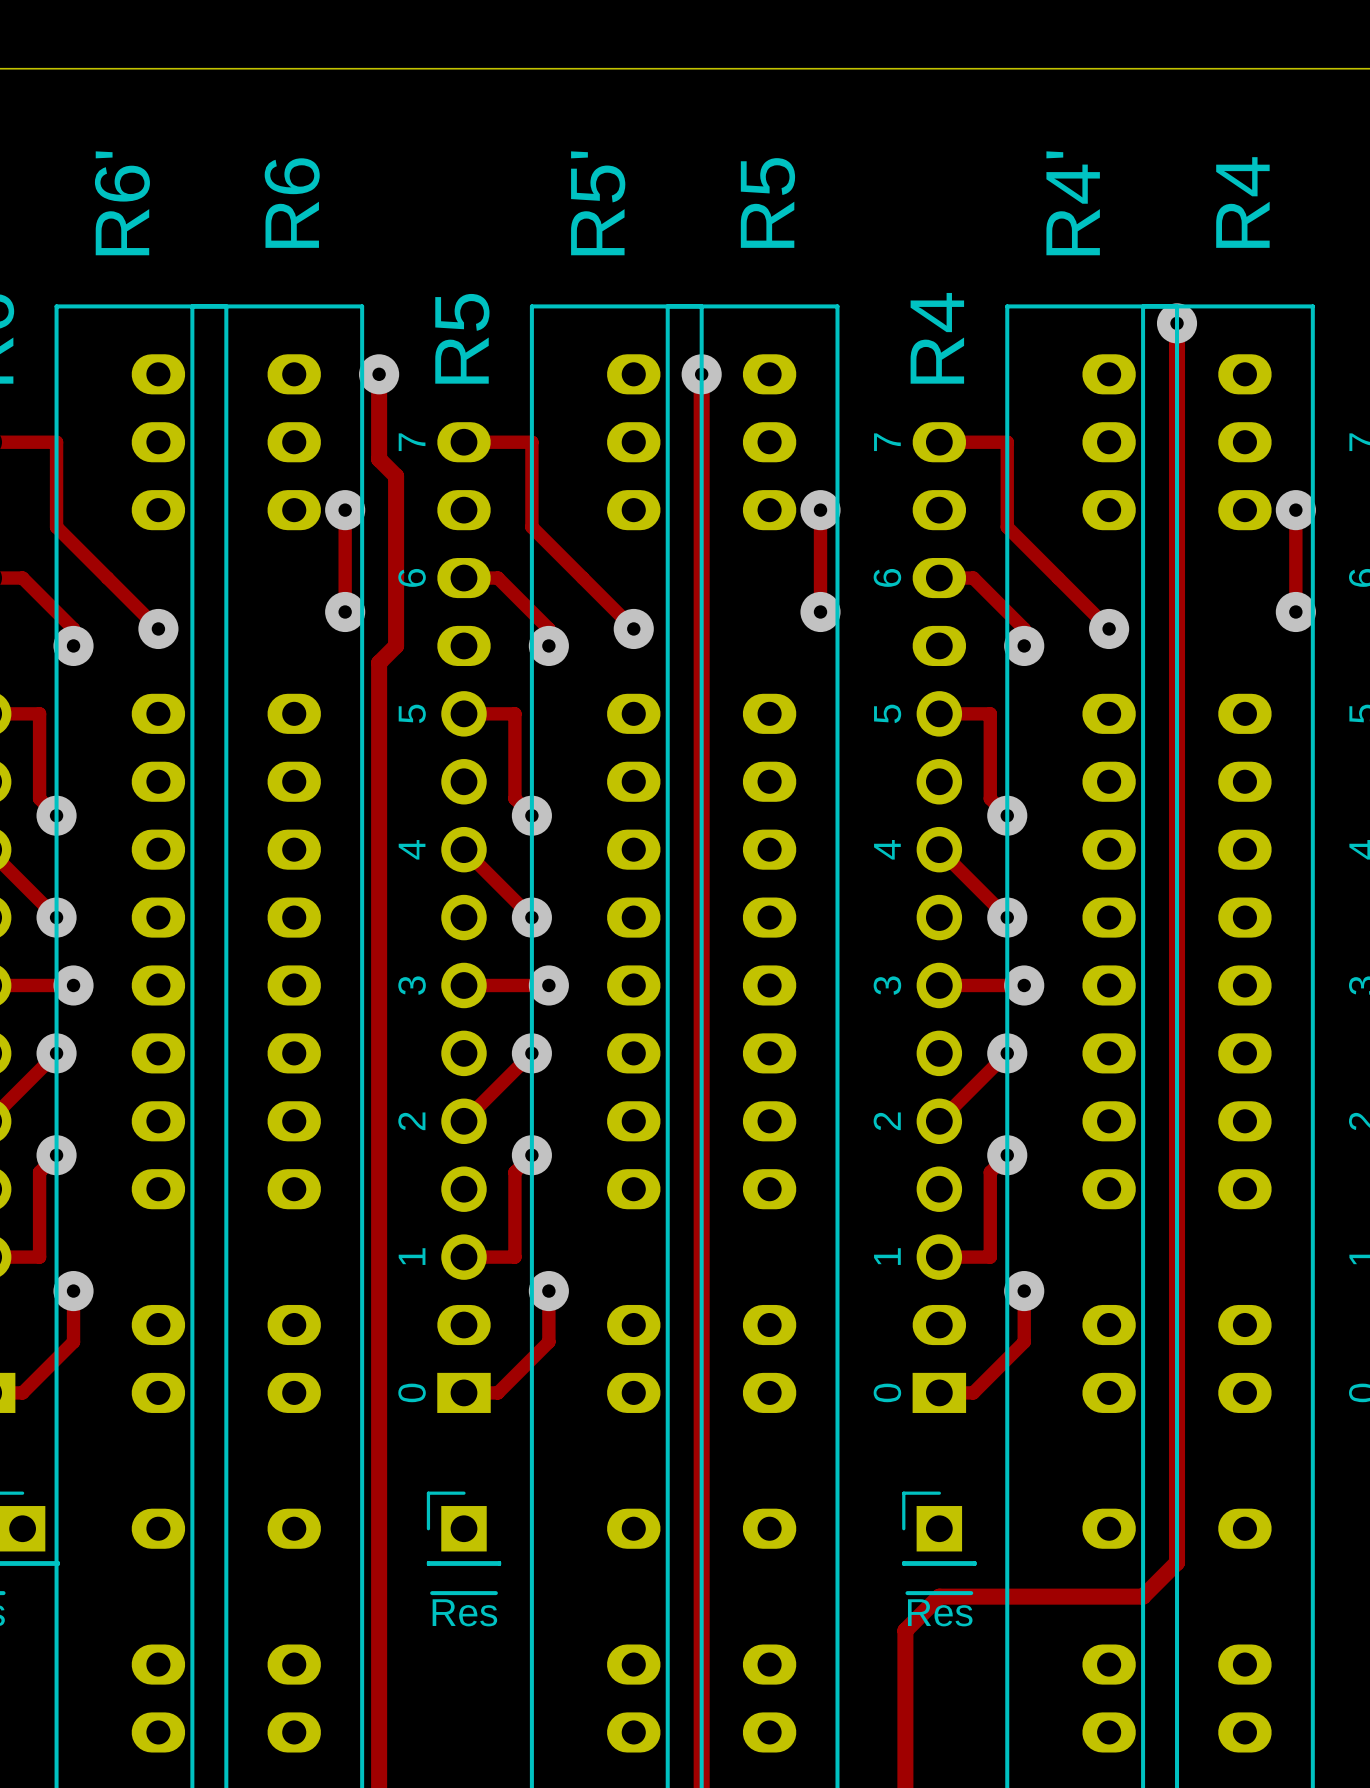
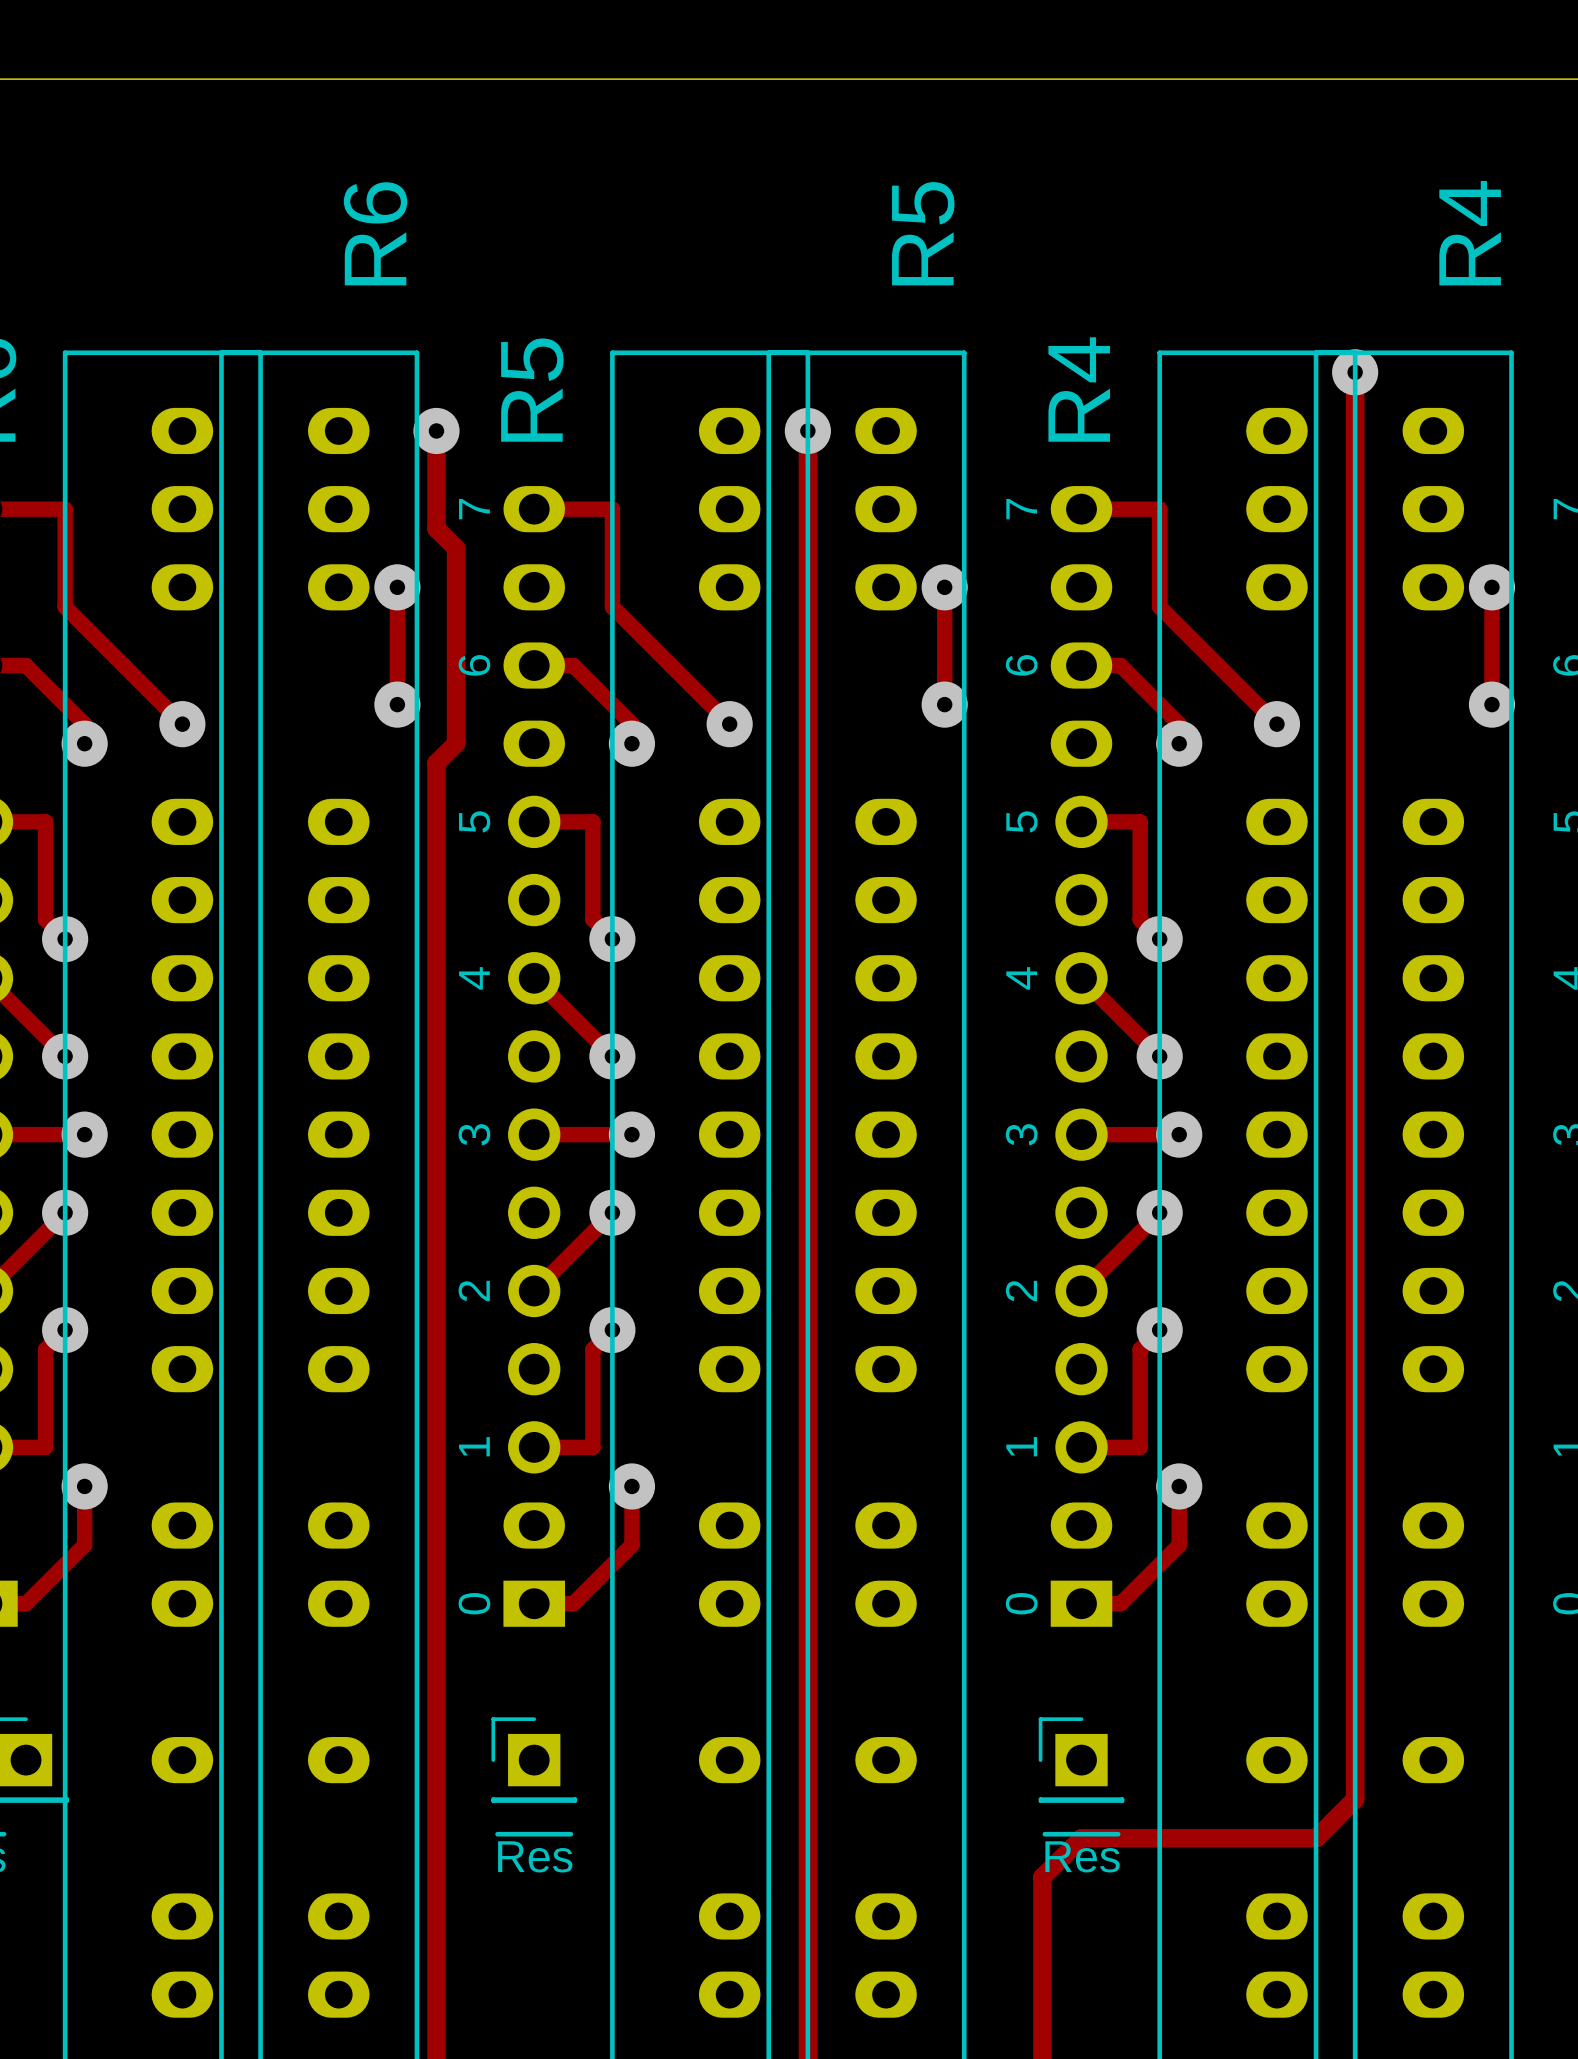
text position: R5 (767, 202) -> R5 (923, 233)
text position: R4 (1242, 202) -> R4 (1470, 233)
text: R6' (122, 203) -> none
text position: R6 (292, 203) -> R6 (375, 233)
text: R5' (598, 203) -> none
text: R4' (1073, 203) -> none

